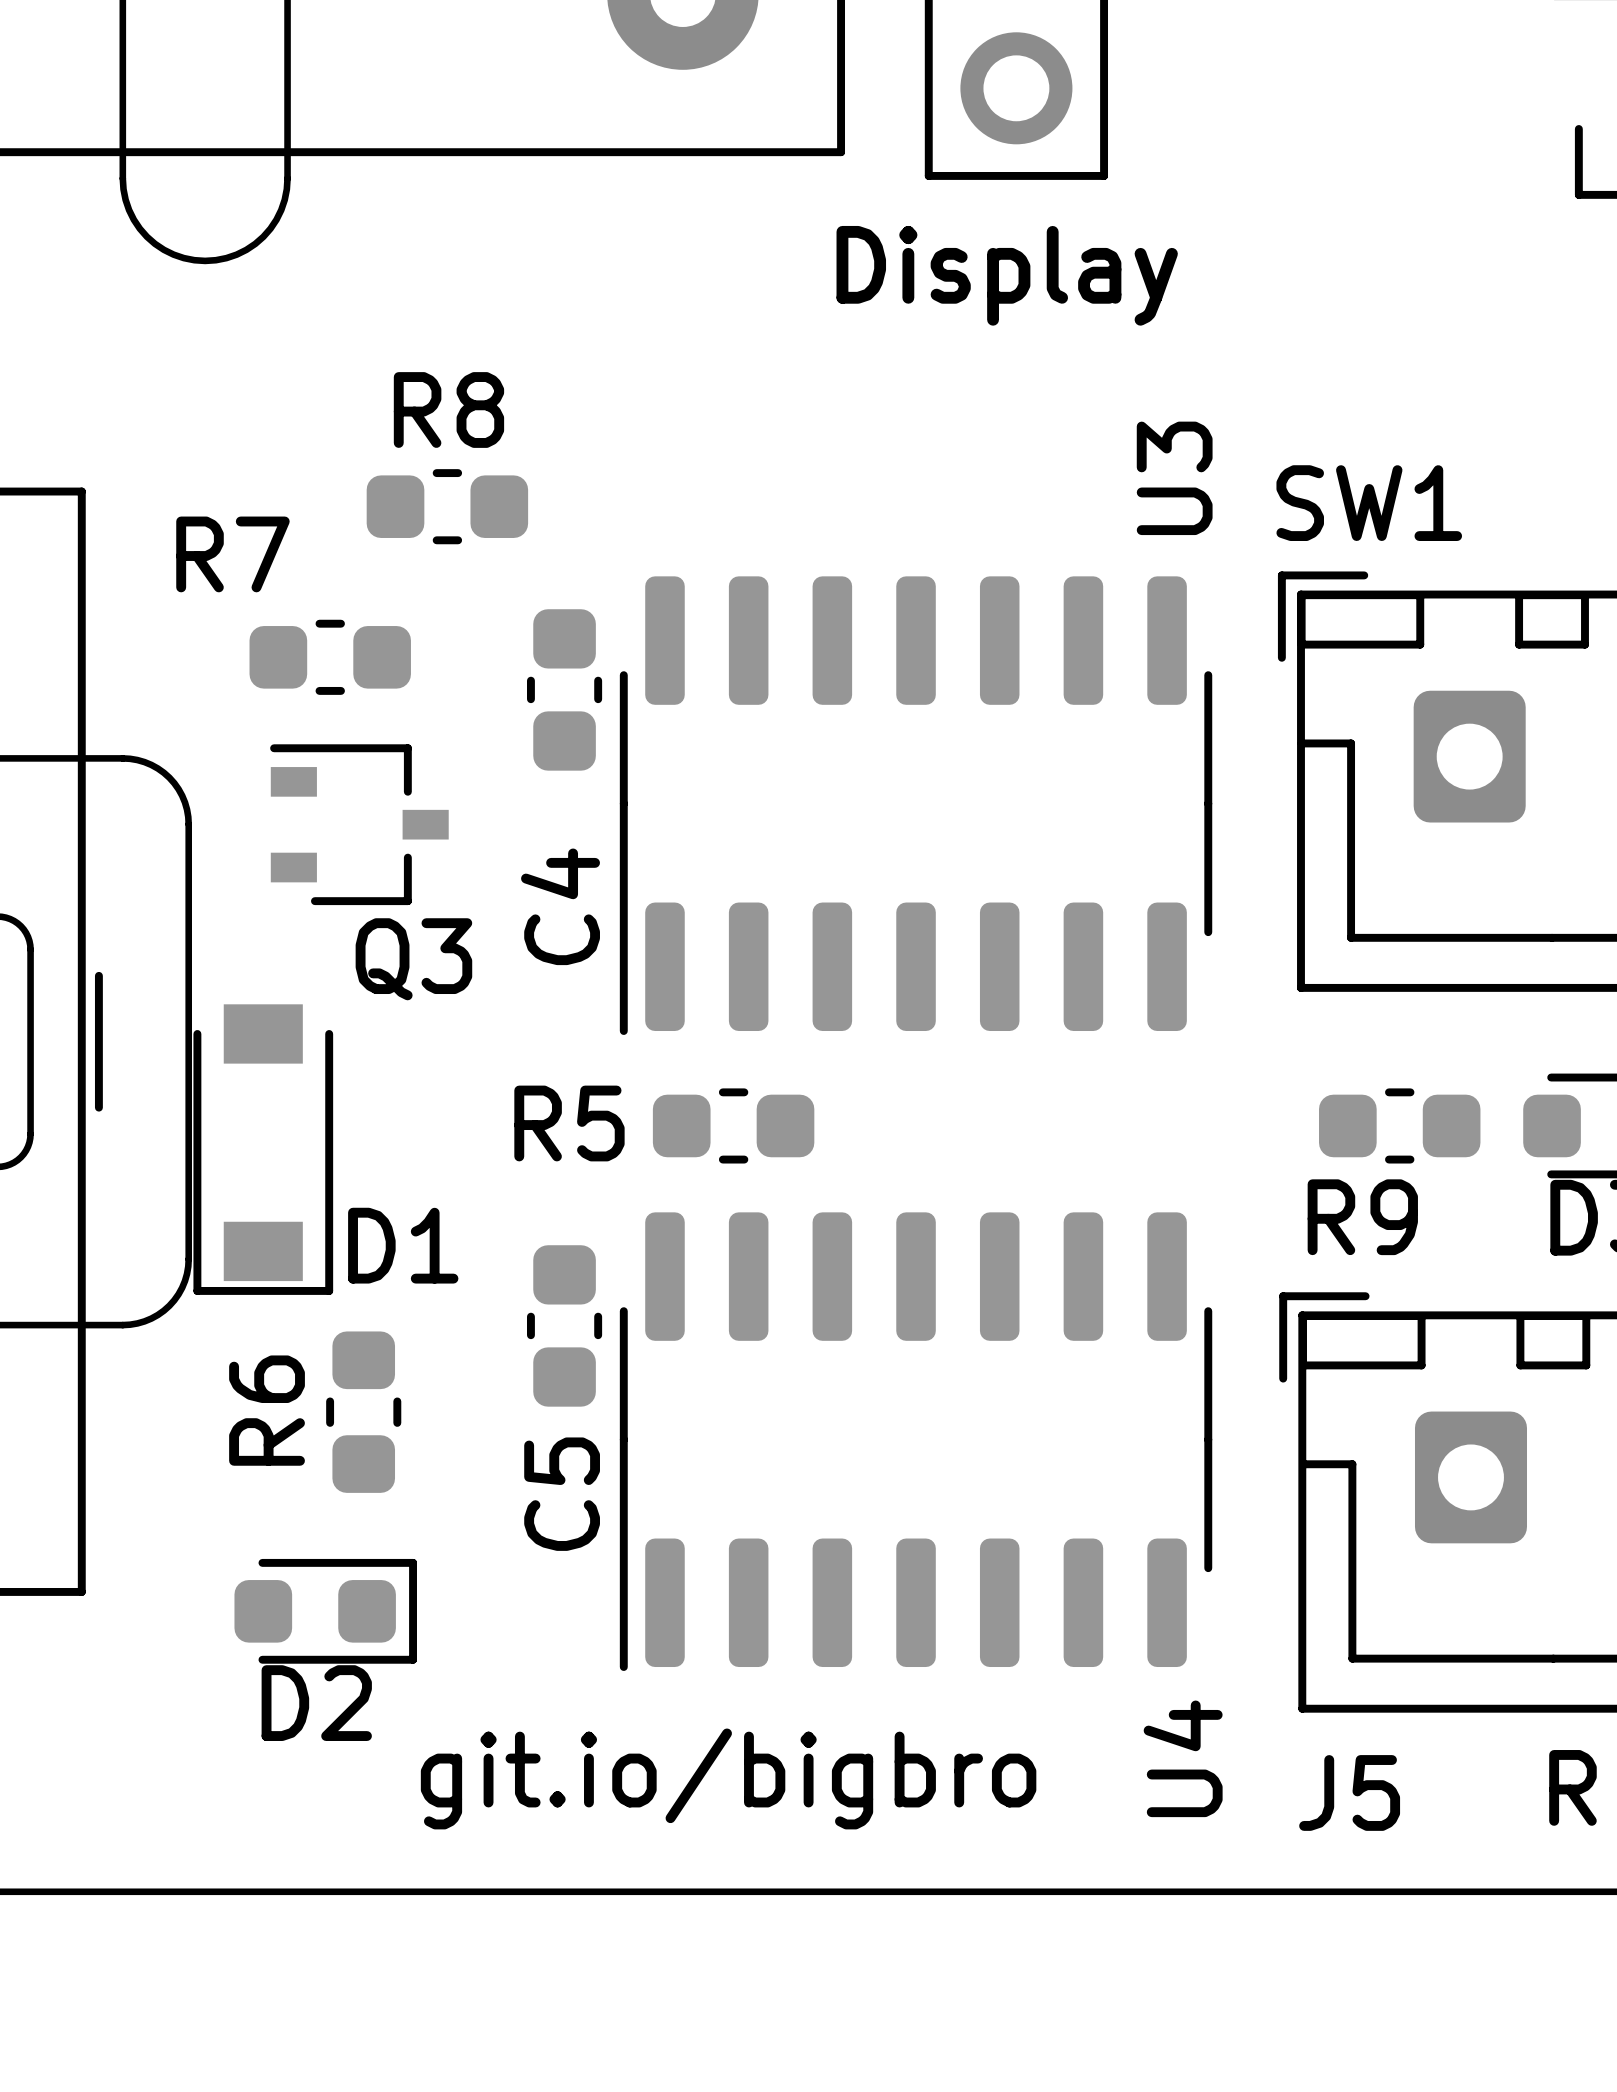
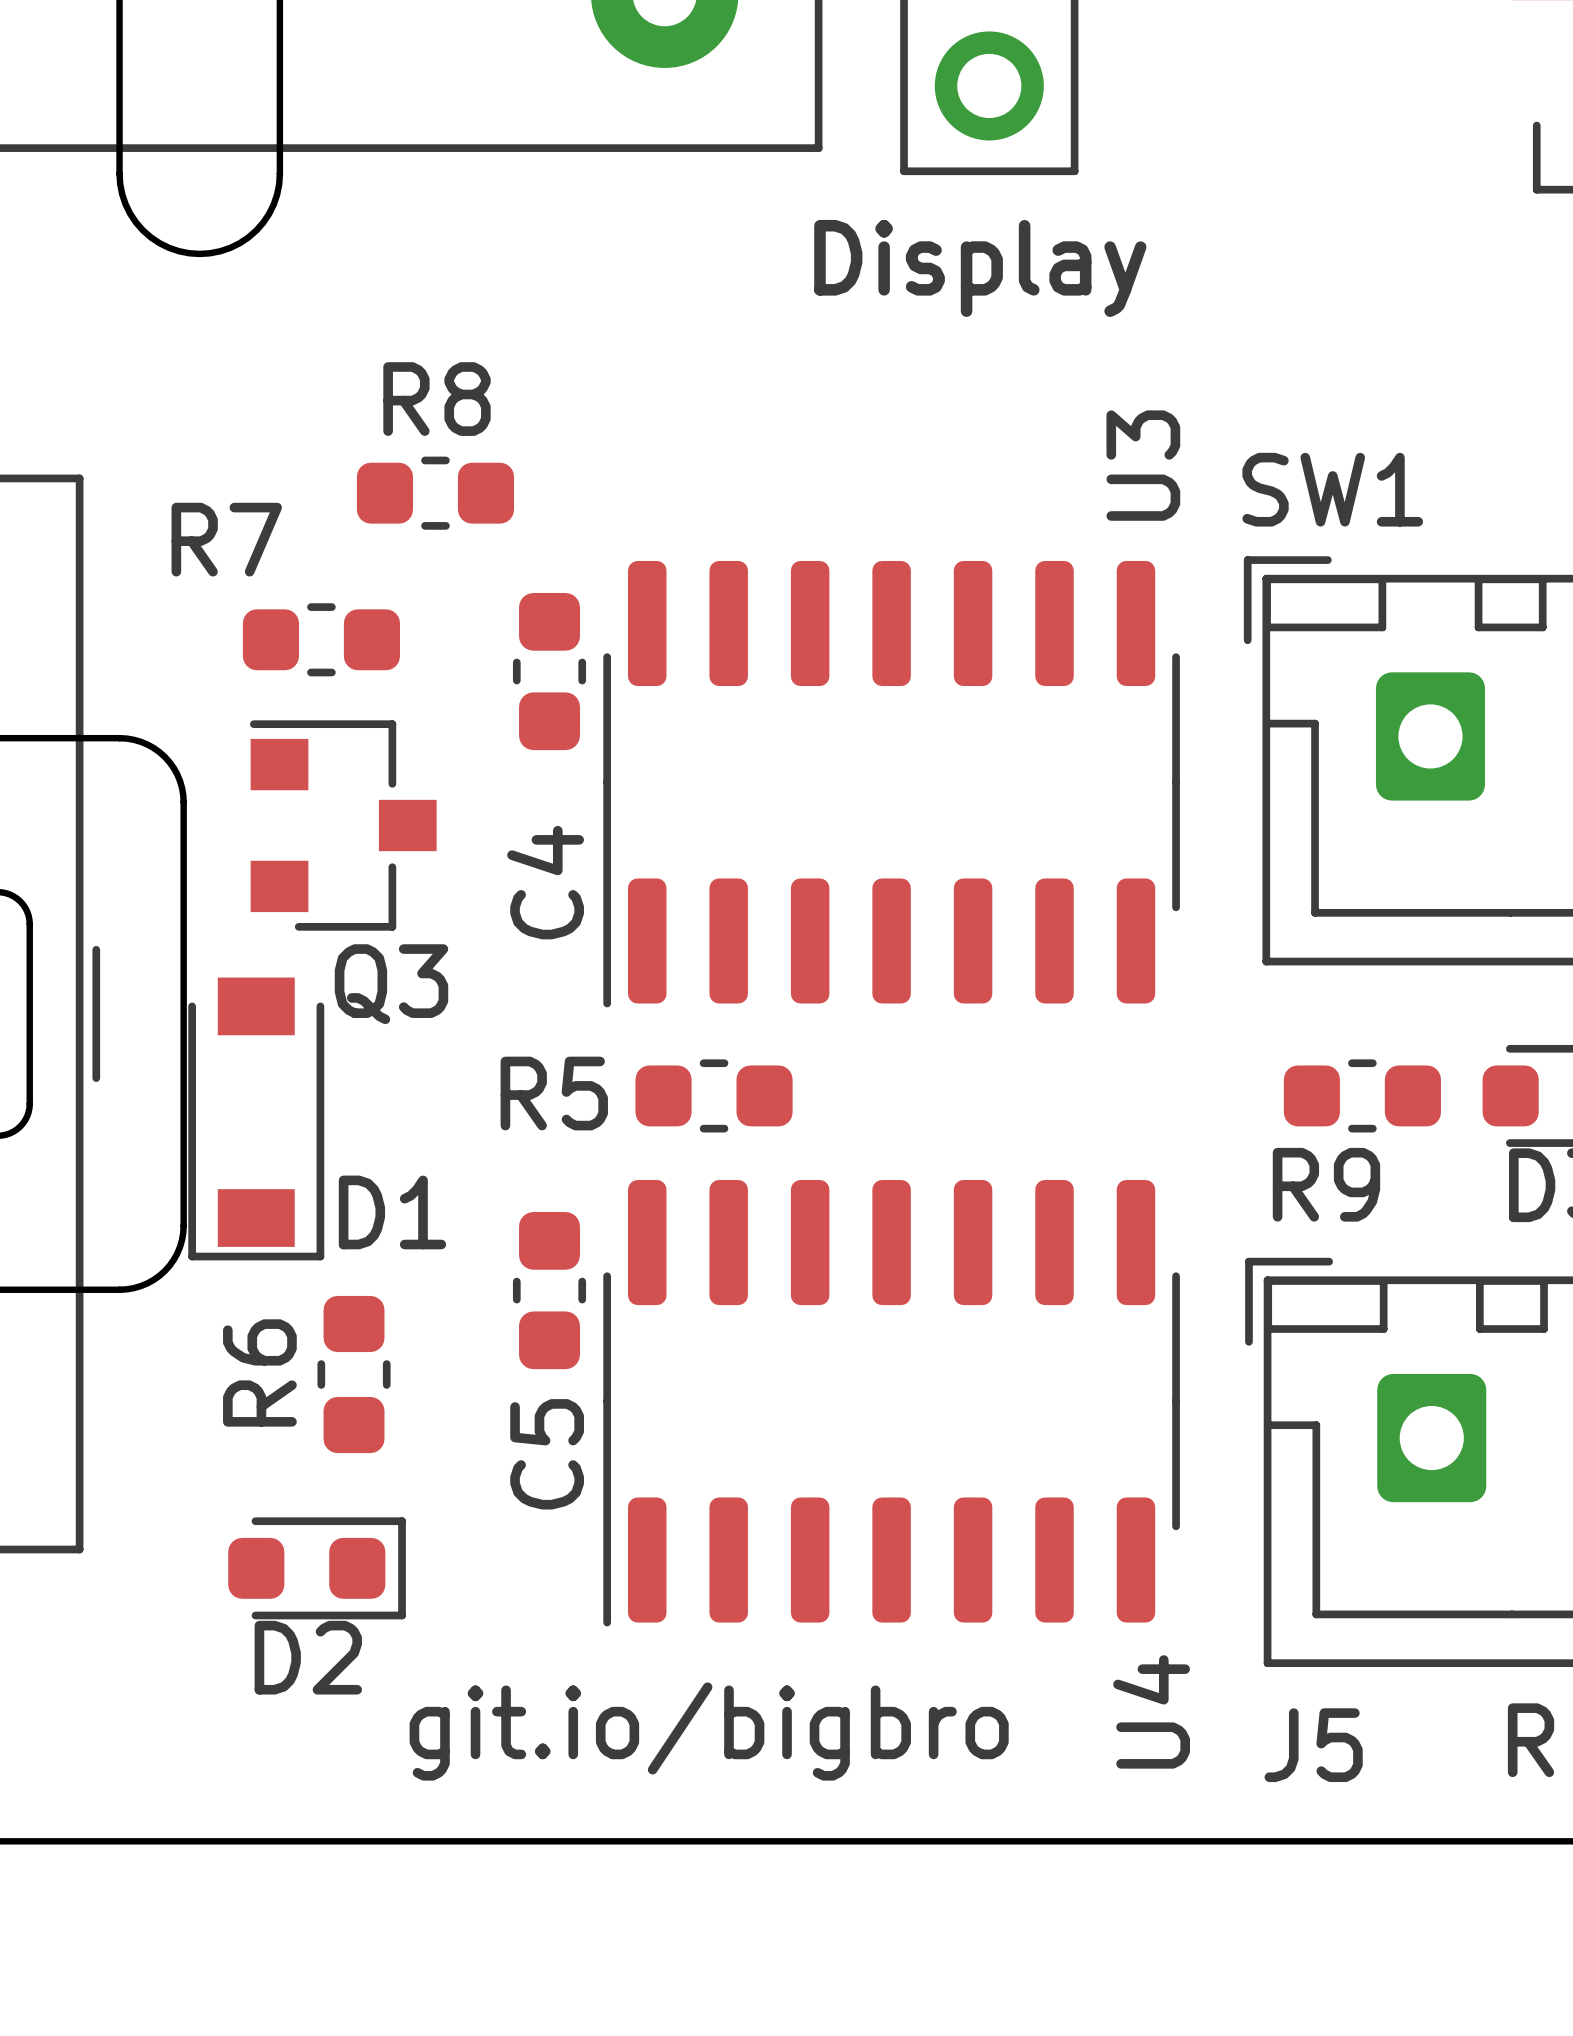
Q3 footprint: [270, 744, 449, 906] -> [250, 720, 437, 931]
Q3 name position: Q3 (413, 959) -> Q3 (391, 984)

